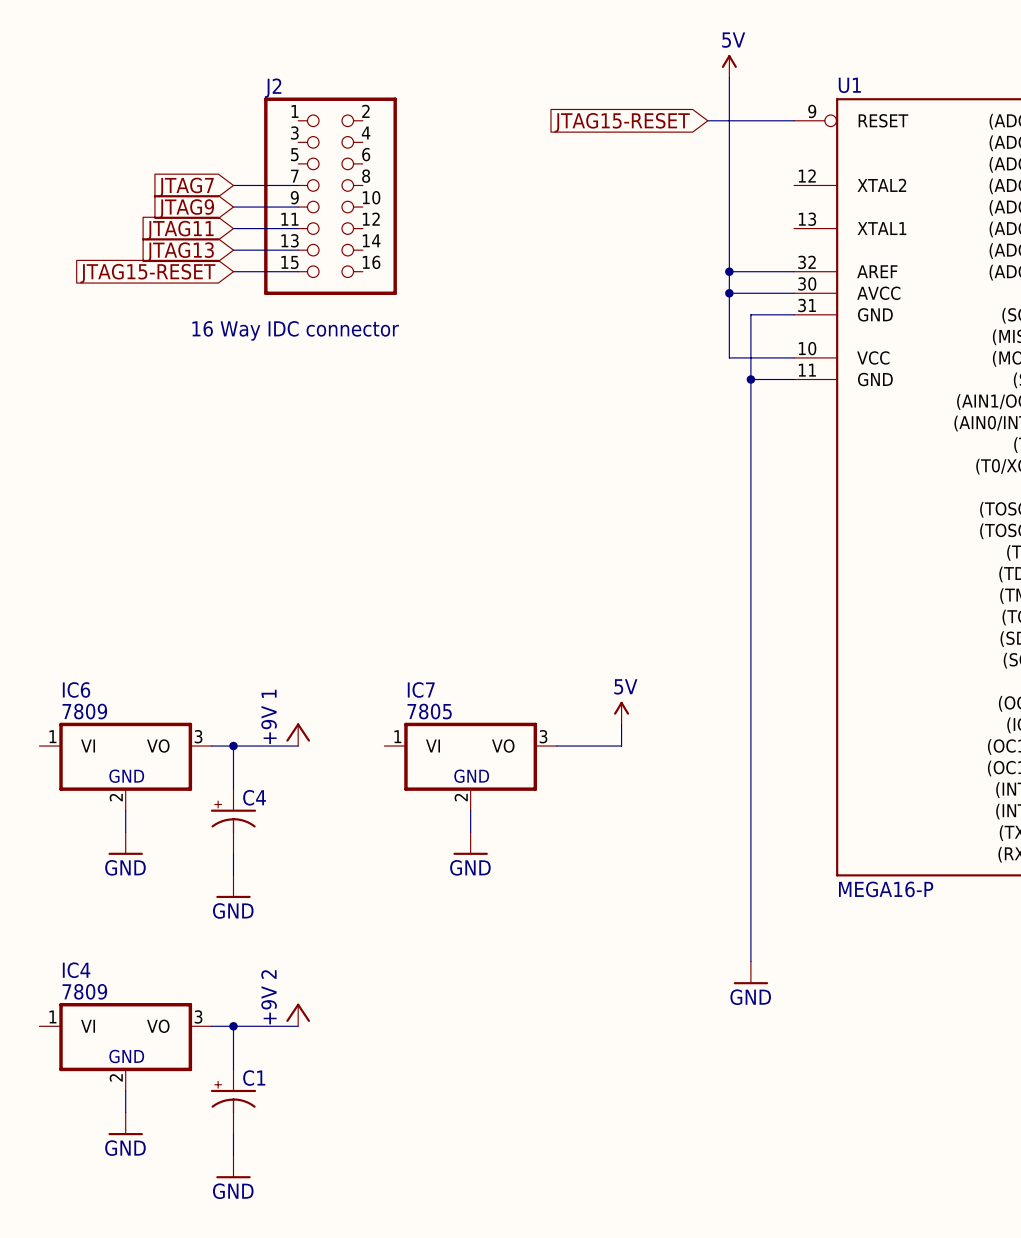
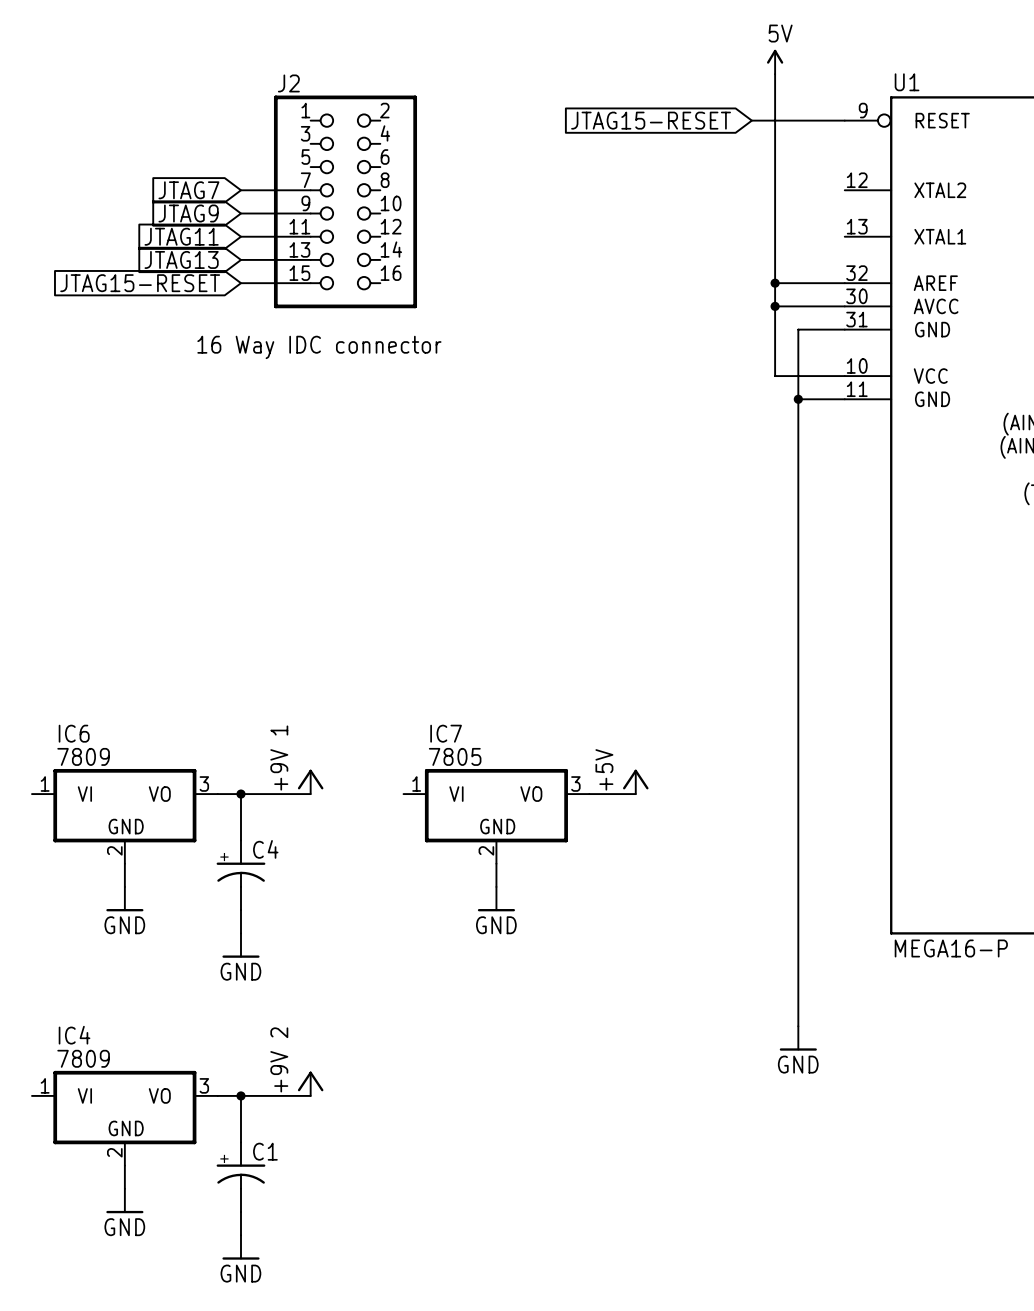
power symbol: 5V (621, 713) -> none
wire: (621, 724) (621, 746) (600, 746) -> none
power symbol: none -> +5V (635, 781)

